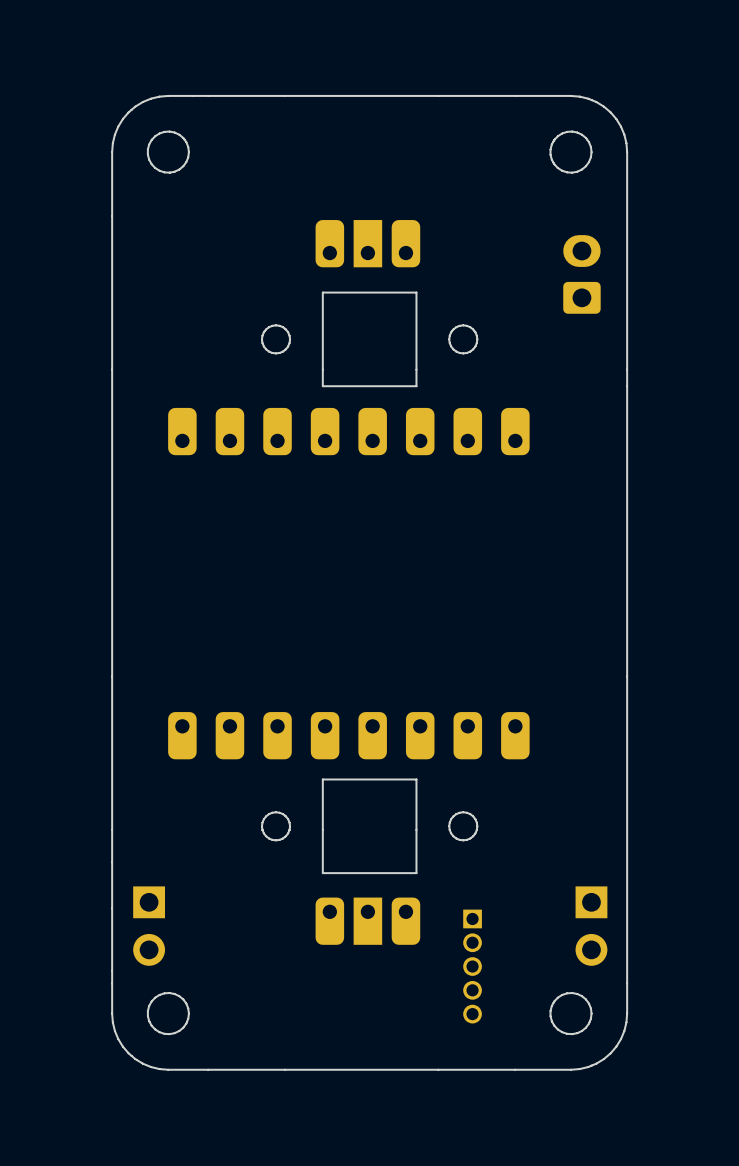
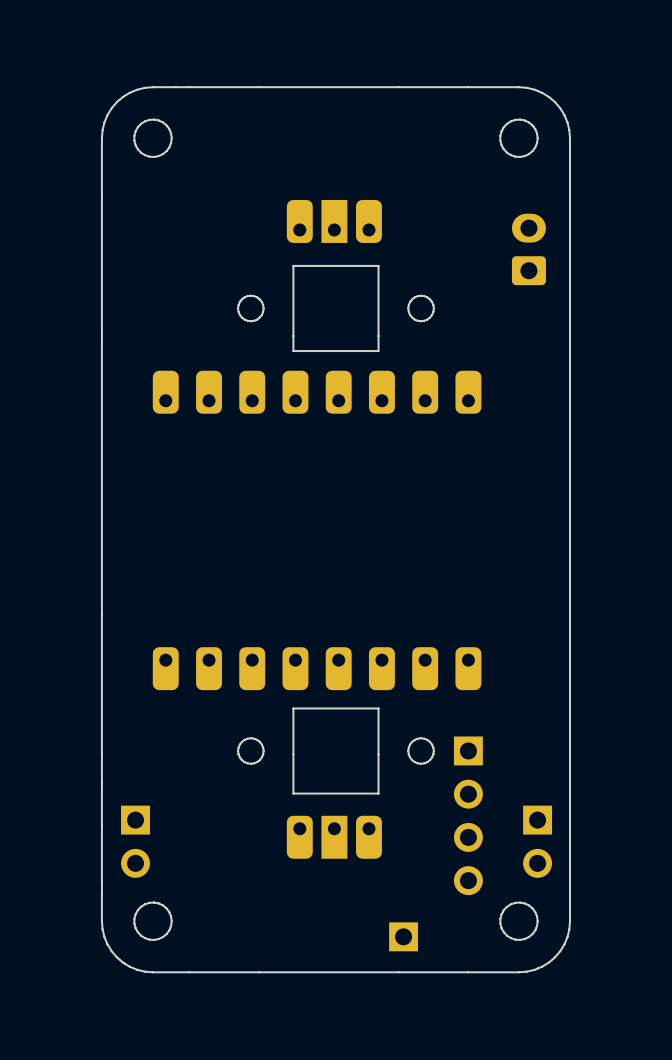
part: none -> (468, 815)
part: (472, 966) -> none
part: none -> (403, 936)

